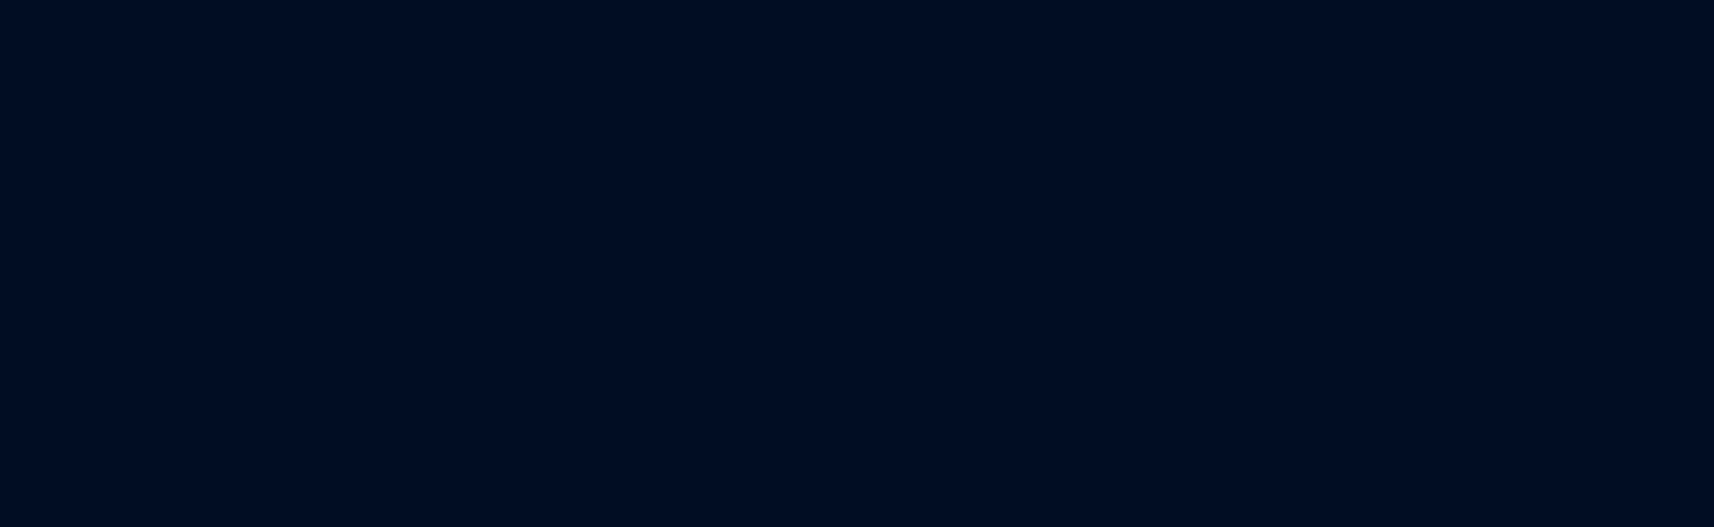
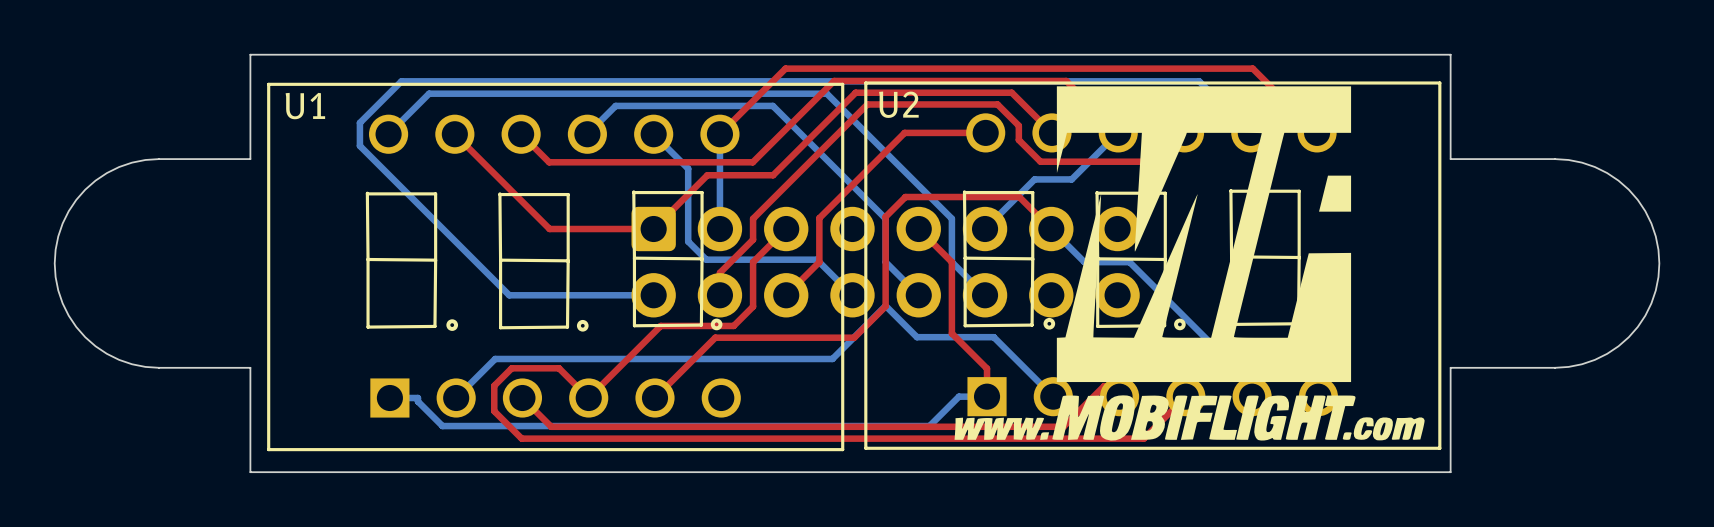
board edge: none -> (250, 54) (1450, 54) (1450, 159) (1568, 159) (1582, 162) (1607, 173) (1618, 180) (1637, 199) (1651, 223) (1658, 249) (1658, 277) (1651, 303) (1637, 326) (1618, 346) (1594, 359) (1582, 364) (1554, 367) (1450, 367) (1450, 472) (250, 472) (250, 367) (145, 366) (132, 364) (106, 353) (85, 337) (68, 315) (58, 290) (54, 263) (58, 236) (68, 211) (85, 189) (106, 173) (132, 162) (145, 159) (250, 159) (250, 54)
drawing: none -> [954, 86, 1425, 441]
top track: none -> (985, 132) (904, 132) (819, 218) (819, 262) (786, 295)
top track: none -> (1051, 132) (1011, 92) (855, 92) (773, 175) (707, 175) (653, 229) (549, 229) (454, 134)
bottom track: none -> (1118, 132) (1071, 179) (1034, 179) (985, 229)
top track: none -> (1118, 132) (1066, 80) (834, 80) (752, 162) (549, 162) (521, 134)
top track: none -> (1184, 132) (1155, 161) (1040, 161) (1018, 139) (1018, 125) (997, 104) (867, 104) (753, 218) (753, 239) (719, 272) (719, 295)
bottom track: none -> (1250, 132) (1199, 81) (401, 81) (359, 122) (359, 145) (509, 295) (653, 295)
top track: none -> (1317, 132) (1252, 68) (785, 68) (719, 134)
bottom track: none -> (388, 134) (429, 93) (826, 93) (951, 218) (951, 262) (985, 295)
bottom track: none -> (587, 134) (615, 105) (772, 105) (885, 218) (885, 262) (918, 295)
bottom track: none -> (653, 134) (688, 168) (688, 241) (706, 259) (816, 259) (852, 295)
bottom track: none -> (719, 134) (719, 229)
top track: none -> (786, 229) (753, 262) (753, 306) (733, 325) (660, 325) (588, 398) (559, 368) (511, 368) (494, 385) (494, 411) (521, 438) (1143, 438) (1185, 396)
top track: none -> (918, 229) (951, 262) (951, 333) (987, 368) (987, 396)
bottom track: none -> (1051, 229) (1084, 262) (1129, 262) (1252, 384) (1252, 396)
top track: none -> (1051, 229) (1019, 197) (905, 197) (885, 216) (885, 306) (854, 337) (715, 337) (655, 398)
part: none -> (885, 262)
U2: none -> (1152, 265)
U1: none -> (555, 266)
bottom track: none -> (987, 396) (958, 396) (929, 426) (442, 426) (417, 401) (417, 398) (389, 398)
bottom track: none -> (1053, 396) (993, 337) (916, 337) (885, 305) (832, 358) (495, 358) (456, 398)
top track: none -> (1119, 396) (1114, 396) (1104, 386) (1063, 426) (551, 426) (522, 398)

